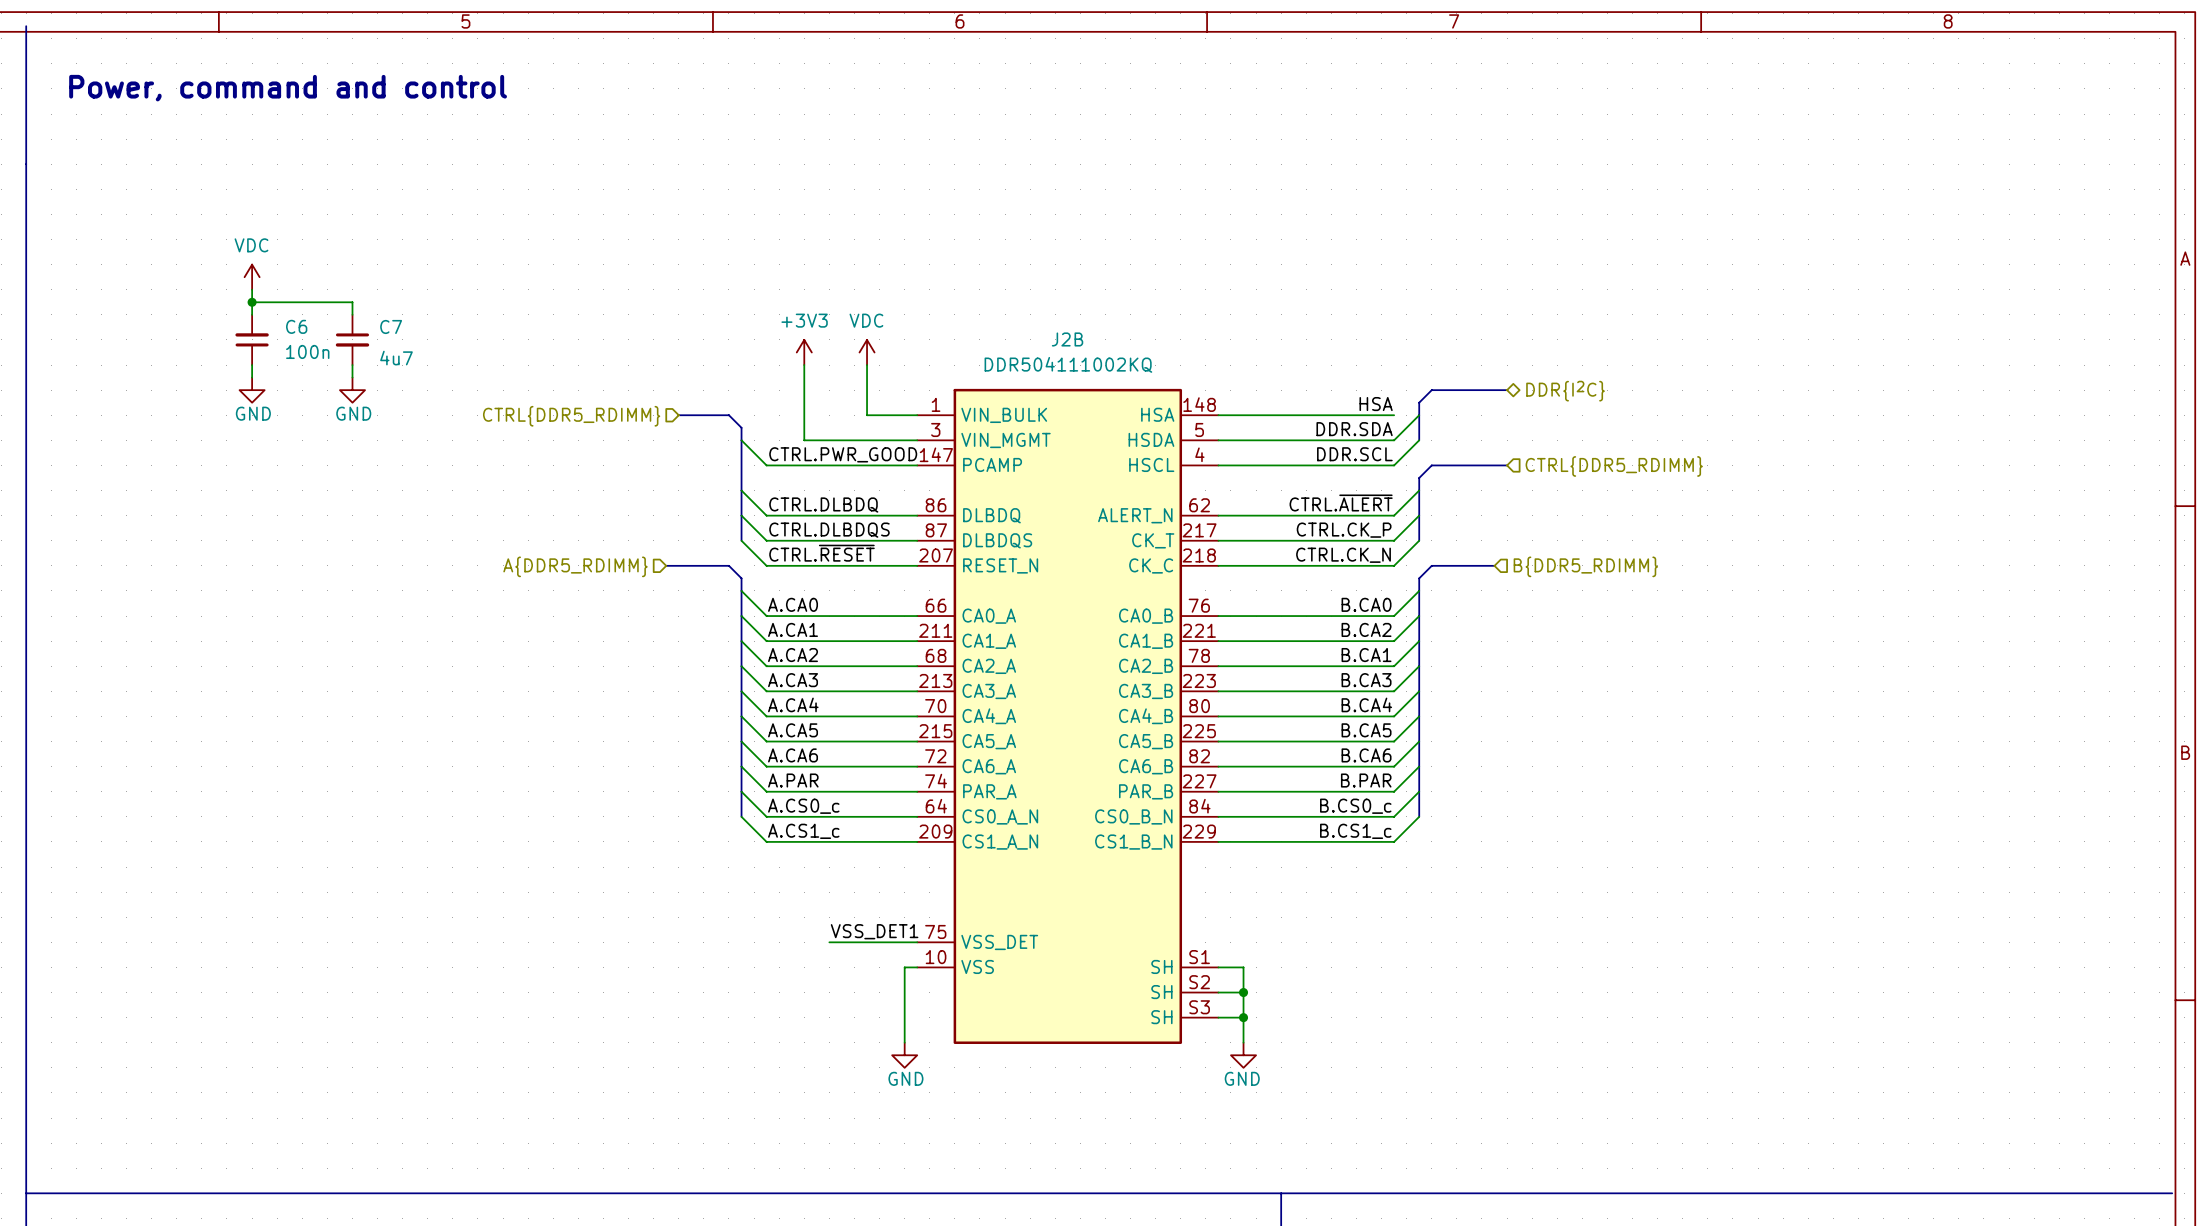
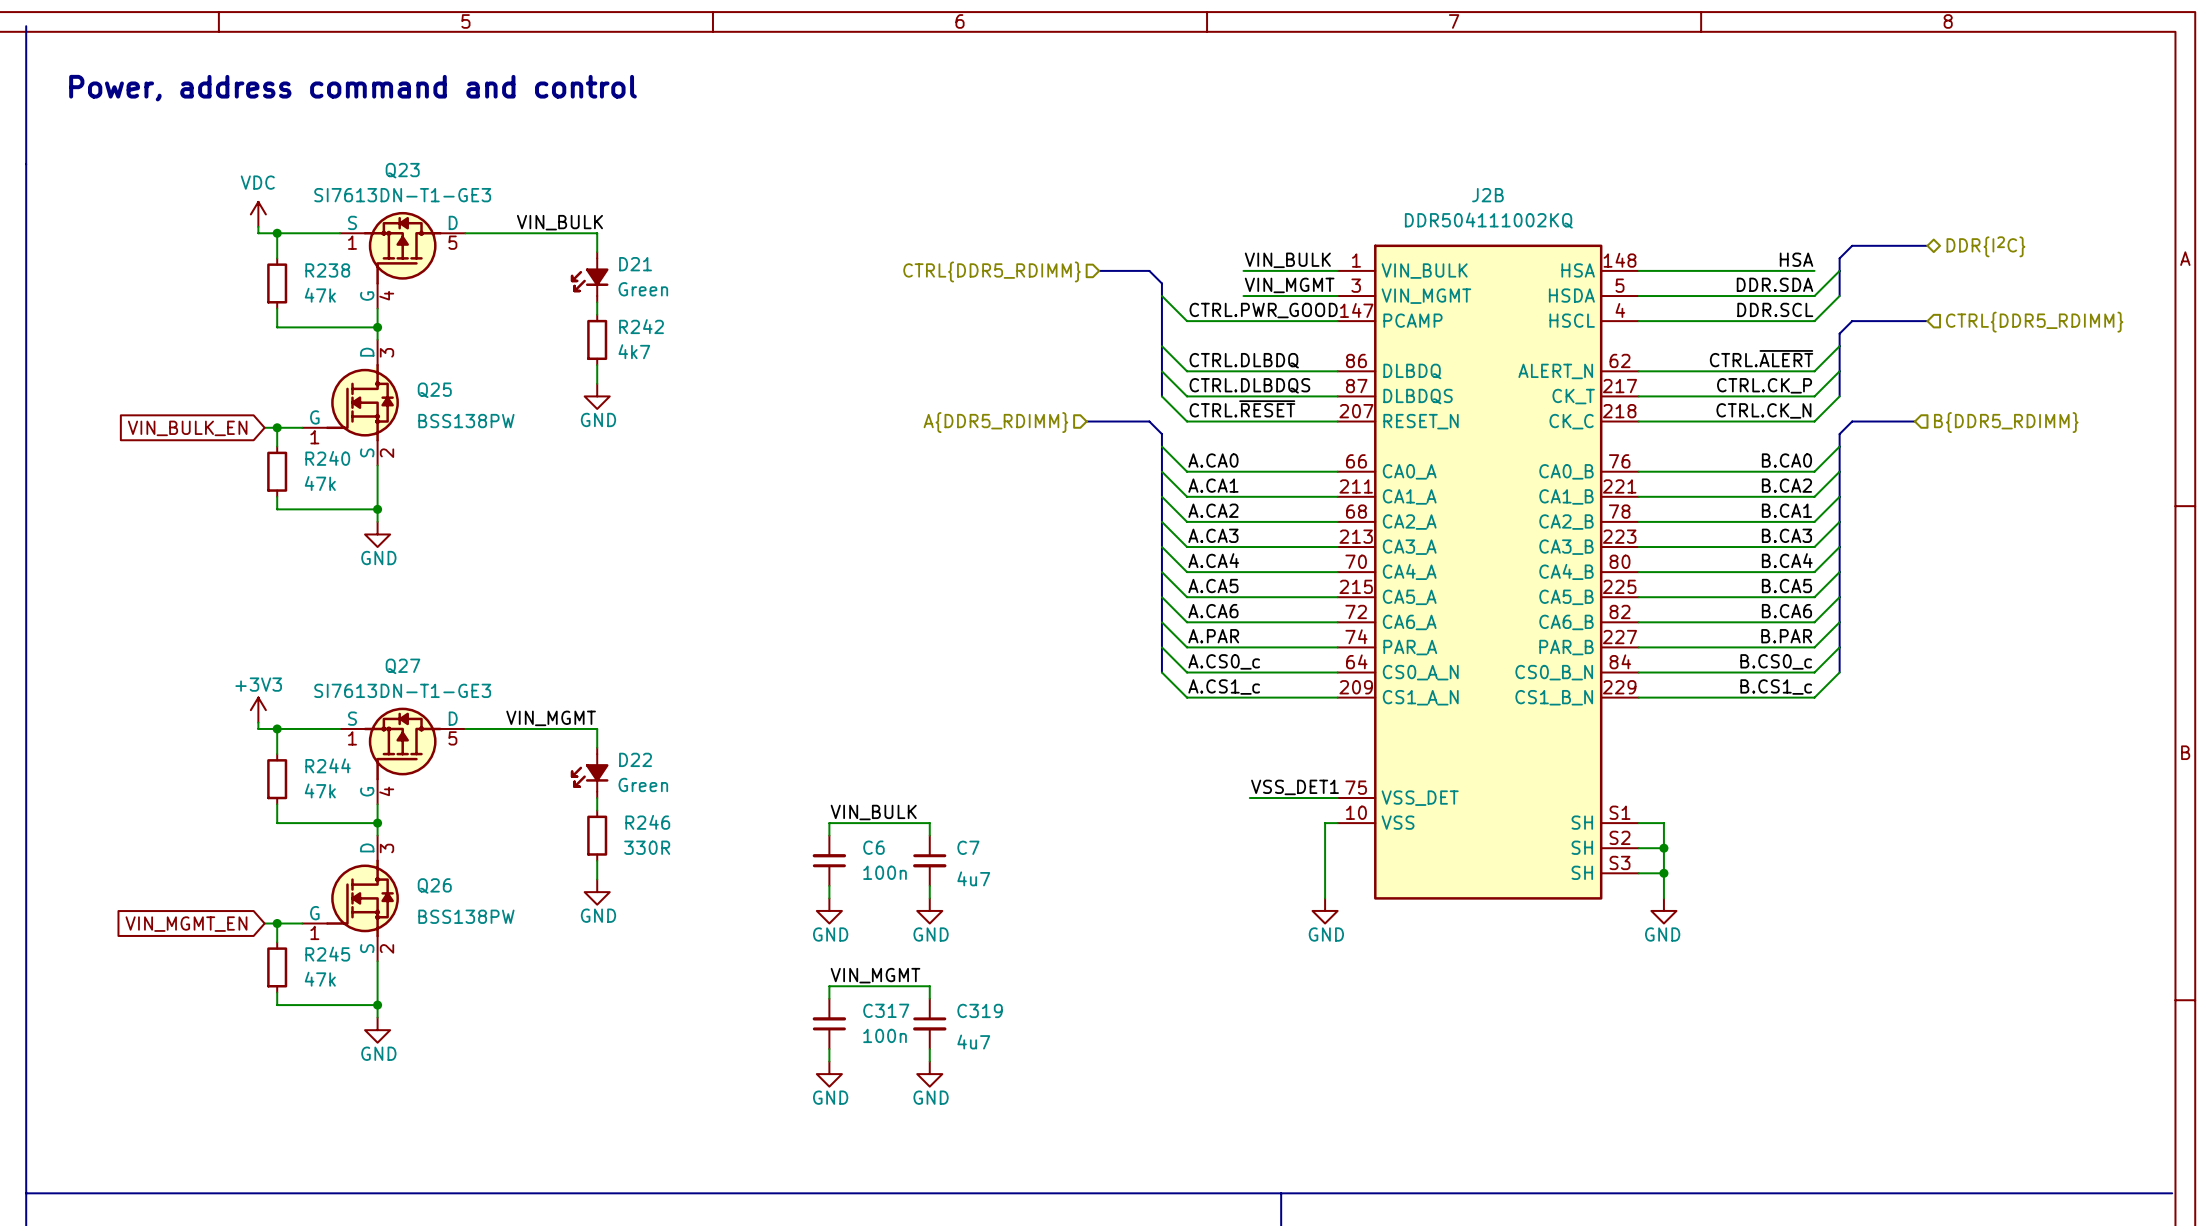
text: Power, command and control (288, 88) -> Power, address command and control (353, 88)
label: none -> VIN_BULK (559, 222)
wire: none -> (258, 226) (258, 233) (339, 233)
junction: none -> (277, 233)
wire: none -> (465, 233) (597, 233) (597, 252)
bus: none -> (1927, 245) (1852, 245) (1839, 258) (1839, 296)
hierarchical label: none -> DDR{I2C} (1985, 246)
label: none -> HSA (1796, 259)
Q23: none -> (402, 260)
label: none -> VIN_BULK (1287, 260)
bus: none -> (1099, 270) (1149, 270) (1161, 283) (1161, 396)
wire: none -> (1243, 270) (1337, 270)
wire: none -> (1638, 270) (1814, 270)
wire: none -> (1839, 270) (1814, 296) (1638, 296)
hierarchical label: none -> CTRL{DDR5_RDIMM} (992, 271)
power symbol position: VDC (252, 277) -> VDC (258, 214)
D21: none -> (589, 277)
R238: none -> (277, 283)
label: none -> DDR.SDA (1774, 284)
label: none -> VIN_MGMT (1289, 285)
wire: (252, 289) (252, 314) -> (277, 233) (277, 258)
wire: none -> (1161, 296) (1187, 321) (1337, 321)
wire: none -> (1243, 296) (1337, 296)
wire: none -> (1839, 296) (1814, 321) (1638, 321)
wire: (252, 302) (352, 302) (352, 314) -> none
junction: (252, 302) -> none
wire: none -> (597, 302) (597, 314)
wire: none -> (277, 308) (277, 327) (377, 327)
wire: none -> (377, 308) (377, 339)
label: none -> DDR.SCL (1775, 309)
label: none -> CTRL.PWR_GOOD (1263, 310)
bus: none -> (1927, 321) (1852, 321) (1839, 333) (1839, 396)
hierarchical label: none -> CTRL{DDR5_RDIMM} (2034, 322)
junction: none -> (377, 327)
C6 position: (252, 339) -> (829, 860)
C7 position: (352, 339) -> (929, 860)
R242: none -> (597, 339)
wire: none -> (1161, 346) (1187, 371) (1337, 371)
wire: none -> (1839, 346) (1814, 371) (1638, 371)
power symbol: +3V3 (804, 352) -> none
power symbol: VDC (867, 352) -> none
label: none -> CTRL.~{ALERT} (1761, 358)
label: none -> CTRL.DLBDQ (1244, 360)
wire: (252, 365) (252, 377) -> none
wire: (352, 365) (352, 377) -> none
wire: none -> (597, 365) (597, 383)
wire: (804, 365) (804, 440) (917, 440) -> none
wire: (867, 365) (867, 415) (917, 415) -> none
wire: none -> (1161, 371) (1187, 396)
wire: none -> (1839, 371) (1814, 396) (1638, 396)
label: none -> CTRL.DLBDQS (1249, 385)
label: none -> CTRL.CK_P (1764, 385)
power symbol: GND (252, 390) -> none
power symbol: GND (352, 390) -> none
bus: (1507, 390) (1431, 390) (1419, 402) (1419, 440) -> none
hierarchical label: DDR{I2C} (1565, 391) -> none
power symbol: none -> GND (597, 396)
wire: none -> (1161, 396) (1187, 421) (1337, 421)
wire: none -> (1187, 396) (1337, 396)
wire: none -> (1839, 396) (1814, 421) (1638, 421)
Q25: none -> BSS138PW (350, 402)
label: HSA (1376, 404) -> none
label: none -> CTRL.~{RESET} (1242, 408)
label: none -> CTRL.CK_N (1763, 410)
bus: (678, 415) (728, 415) (741, 427) (741, 540) -> none
wire: (1218, 415) (1394, 415) -> none
wire: (1419, 415) (1394, 440) (1218, 440) -> none
hierarchical label: CTRL{DDR5_RDIMM} (571, 416) -> none
bus: none -> (1086, 421) (1149, 421) (1161, 434) (1161, 672)
bus: none -> (1914, 421) (1852, 421) (1839, 434) (1839, 672)
hierarchical label: none -> A{DDR5_RDIMM} (995, 422)
hierarchical label: none -> B{DDR5_RDIMM} (2006, 422)
wire: none -> (264, 427) (302, 427)
wire: none -> (277, 427) (277, 446)
junction: none -> (277, 427)
global label: none -> VIN_BULK_EN (187, 428)
label: DDR.SDA (1354, 429) -> none
wire: (741, 440) (766, 465) (917, 465) -> none
wire: (1419, 440) (1394, 465) (1218, 465) -> none
wire: none -> (1161, 446) (1187, 471) (1337, 471)
wire: none -> (1839, 446) (1814, 471) (1638, 471)
label: CTRL.PWR_GOOD (843, 454) -> none
label: DDR.SCL (1354, 454) -> none
label: none -> A.CA0 (1213, 460)
label: none -> B.CA0 (1786, 460)
wire: none -> (377, 465) (377, 521)
bus: (1507, 465) (1431, 465) (1419, 477) (1419, 540) -> none
hierarchical label: CTRL{DDR5_RDIMM} (1614, 466) -> none
R240: none -> (277, 471)
wire: none -> (1161, 471) (1187, 496) (1337, 496)
wire: none -> (1839, 471) (1814, 496) (1638, 496)
label: none -> A.CA1 (1213, 485)
label: none -> B.CA2 (1786, 485)
wire: (741, 490) (766, 515) (917, 515) -> none
wire: (1419, 490) (1394, 515) (1218, 515) -> none
wire: none -> (277, 496) (277, 509) (377, 509)
wire: none -> (1161, 496) (1187, 521) (1337, 521)
wire: none -> (1839, 496) (1814, 521) (1638, 521)
label: CTRL.~{ALERT} (1341, 502) -> none
label: CTRL.DLBDQ (823, 505) -> none
junction: none -> (377, 509)
label: none -> A.CA2 (1213, 510)
label: none -> B.CA1 (1786, 510)
wire: (741, 515) (766, 540) (917, 540) -> none
wire: (1419, 515) (1394, 540) (1218, 540) -> none
wire: none -> (1161, 521) (1187, 547) (1337, 547)
wire: none -> (1839, 521) (1814, 547) (1638, 547)
label: CTRL.DLBDQS (829, 530) -> none
label: CTRL.CK_P (1344, 530) -> none
power symbol: none -> GND (377, 534)
label: none -> A.CA3 (1213, 535)
label: none -> B.CA3 (1786, 535)
wire: (741, 540) (766, 565) (917, 565) -> none
wire: (1419, 540) (1394, 565) (1218, 565) -> none
wire: none -> (1161, 547) (1187, 572) (1337, 572)
wire: none -> (1839, 547) (1814, 572) (1638, 572)
label: CTRL.~{RESET} (822, 553) -> none
label: CTRL.CK_N (1343, 555) -> none
label: none -> A.CA4 (1213, 560)
label: none -> B.CA4 (1787, 560)
bus: (666, 565) (728, 565) (741, 578) (741, 816) -> none
bus: (1494, 565) (1431, 565) (1419, 578) (1419, 816) -> none
hierarchical label: A{DDR5_RDIMM} (575, 566) -> none
hierarchical label: B{DDR5_RDIMM} (1585, 566) -> none
wire: none -> (1161, 572) (1187, 597) (1337, 597)
wire: none -> (1839, 572) (1814, 597) (1638, 597)
label: none -> A.CA5 (1213, 586)
label: none -> B.CA5 (1786, 586)
wire: (741, 590) (766, 616) (917, 616) -> none
wire: (1419, 590) (1394, 616) (1218, 616) -> none
wire: none -> (1161, 597) (1187, 622) (1337, 622)
wire: none -> (1839, 597) (1814, 622) (1638, 622)
label: A.CA0 (793, 604) -> none
label: B.CA0 (1366, 604) -> none
label: none -> A.CA6 (1213, 611)
label: none -> B.CA6 (1786, 611)
wire: (741, 616) (766, 641) (917, 641) -> none
wire: (1419, 616) (1394, 641) (1218, 641) -> none
wire: none -> (1161, 622) (1187, 647) (1337, 647)
wire: none -> (1839, 622) (1814, 647) (1638, 647)
label: A.CA1 (793, 629) -> none
label: B.CA2 (1366, 629) -> none
label: none -> A.PAR (1213, 636)
label: none -> B.PAR (1786, 636)
wire: (741, 641) (766, 666) (917, 666) -> none
wire: (1419, 641) (1394, 666) (1218, 666) -> none
wire: none -> (1161, 647) (1187, 672) (1337, 672)
wire: none -> (1839, 647) (1814, 672) (1638, 672)
label: A.CA2 (793, 655) -> none
label: B.CA1 (1366, 655) -> none
label: none -> A.CS0_c (1224, 661)
label: none -> B.CS0_c (1776, 661)
wire: (741, 666) (766, 691) (917, 691) -> none
wire: (1419, 666) (1394, 691) (1218, 691) -> none
wire: none -> (1161, 672) (1187, 697) (1337, 697)
wire: none -> (1839, 672) (1814, 697) (1638, 697)
label: A.CA3 (793, 680) -> none
label: B.CA3 (1366, 680) -> none
label: none -> A.CS1_c (1224, 687)
label: none -> B.CS1_c (1776, 687)
wire: (741, 691) (766, 716) (917, 716) -> none
wire: (1419, 691) (1394, 716) (1218, 716) -> none
label: A.CA4 (793, 704) -> none
label: B.CA4 (1366, 704) -> none
power symbol: none -> +3V3 (258, 710)
wire: (741, 716) (766, 741) (917, 741) -> none
J2B position: (1067, 716) -> (1488, 572)
wire: (1419, 716) (1394, 741) (1218, 741) -> none
label: none -> VIN_MGMT (551, 718)
wire: none -> (258, 722) (258, 728) (339, 728)
wire: none -> (277, 728) (277, 754)
junction: none -> (277, 728)
wire: none -> (465, 728) (597, 728) (597, 747)
label: A.CA5 (793, 730) -> none
label: B.CA5 (1366, 730) -> none
wire: (741, 741) (766, 766) (917, 766) -> none
wire: (1419, 741) (1394, 766) (1218, 766) -> none
Q27: none -> (402, 755)
label: A.CA6 (793, 755) -> none
label: B.CA6 (1366, 755) -> none
wire: (741, 766) (766, 791) (917, 791) -> none
wire: (1419, 766) (1394, 791) (1218, 791) -> none
D22: none -> (589, 772)
R244: none -> (277, 779)
label: A.PAR (793, 780) -> none
label: B.PAR (1366, 780) -> none
label: none -> VSS_DET1 (1295, 787)
wire: (741, 791) (766, 816) (917, 816) -> none
wire: (1419, 791) (1394, 816) (1218, 816) -> none
wire: none -> (597, 798) (597, 810)
wire: none -> (1249, 798) (1337, 798)
wire: none -> (277, 804) (277, 823) (377, 823)
wire: none -> (377, 804) (377, 835)
label: A.CS0_c (803, 806) -> none
label: B.CS0_c (1355, 806) -> none
label: none -> VIN_BULK (873, 812)
wire: (741, 816) (766, 841) (917, 841) -> none
wire: (1419, 816) (1394, 841) (1218, 841) -> none
junction: none -> (377, 823)
wire: none -> (1337, 823) (1325, 823) (1325, 898)
wire: none -> (1638, 823) (1663, 823) (1663, 898)
label: A.CS1_c (803, 831) -> none
label: B.CS1_c (1355, 831) -> none
R246: none -> (597, 835)
wire: none -> (829, 835) (829, 823) (929, 823) (929, 835)
wire: none -> (1638, 848) (1663, 848)
junction: none -> (1663, 848)
wire: none -> (597, 860) (597, 879)
wire: none -> (1638, 873) (1663, 873)
junction: none -> (1663, 873)
wire: none -> (829, 885) (829, 898)
wire: none -> (929, 885) (929, 898)
power symbol: none -> GND (597, 892)
Q26: none -> BSS138PW (350, 898)
power symbol: none -> GND (829, 910)
power symbol: none -> GND (929, 910)
power symbol: none -> GND (1325, 910)
power symbol: none -> GND (1663, 910)
wire: none -> (264, 923) (302, 923)
wire: none -> (277, 923) (277, 942)
junction: none -> (277, 923)
global label: none -> VIN_MGMT_EN (186, 924)
label: VSS_DET1 (874, 931) -> none
wire: (829, 942) (917, 942) -> none
wire: none -> (377, 961) (377, 1017)
R245: none -> (277, 967)
wire: (917, 967) (904, 967) (904, 1042) -> none
wire: (1218, 967) (1243, 967) (1243, 1042) -> none
label: none -> VIN_MGMT (875, 975)
wire: none -> (277, 992) (277, 1005) (377, 1005)
wire: (1218, 992) (1243, 992) -> none
junction: (1243, 992) -> none
wire: none -> (829, 998) (829, 986) (929, 986) (929, 998)
junction: none -> (377, 1005)
wire: (1218, 1017) (1243, 1017) -> none
junction: (1243, 1017) -> none
C317: none -> (829, 1023)
C319: none -> (929, 1023)
power symbol: none -> GND (377, 1030)
wire: none -> (829, 1049) (829, 1061)
wire: none -> (929, 1049) (929, 1061)
power symbol position: GND (904, 1055) -> GND (929, 1074)
power symbol: GND (1243, 1055) -> none
power symbol: none -> GND (829, 1074)

